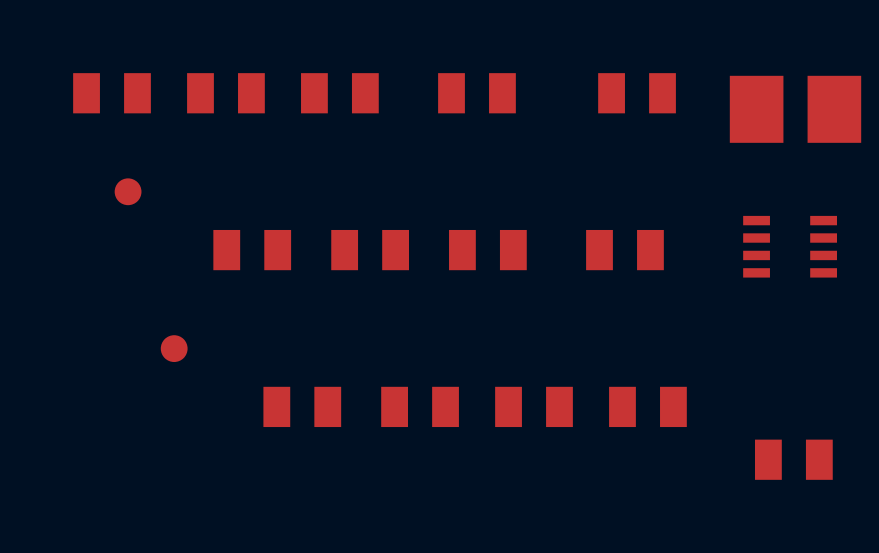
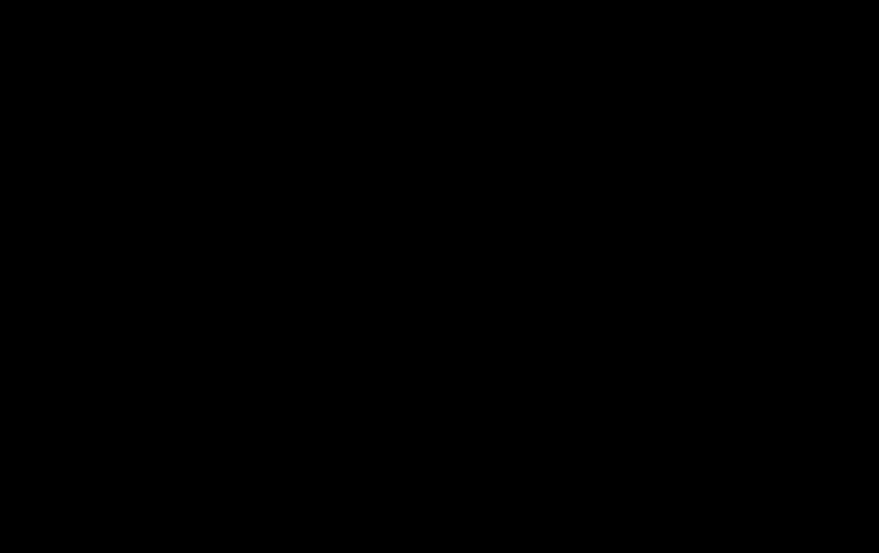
part: (112, 93) -> none
part: (225, 93) -> none
part: (339, 93) -> none
part: (476, 93) -> none
part: (637, 93) -> none
part: (795, 109) -> none
part: (128, 191) -> none
part: (790, 246) -> none
part: (252, 250) -> none
part: (370, 250) -> none
part: (487, 250) -> none
part: (624, 250) -> none
part: (174, 348) -> none
part: (302, 406) -> none
part: (420, 406) -> none
part: (534, 406) -> none
part: (647, 406) -> none
part: (793, 459) -> none

